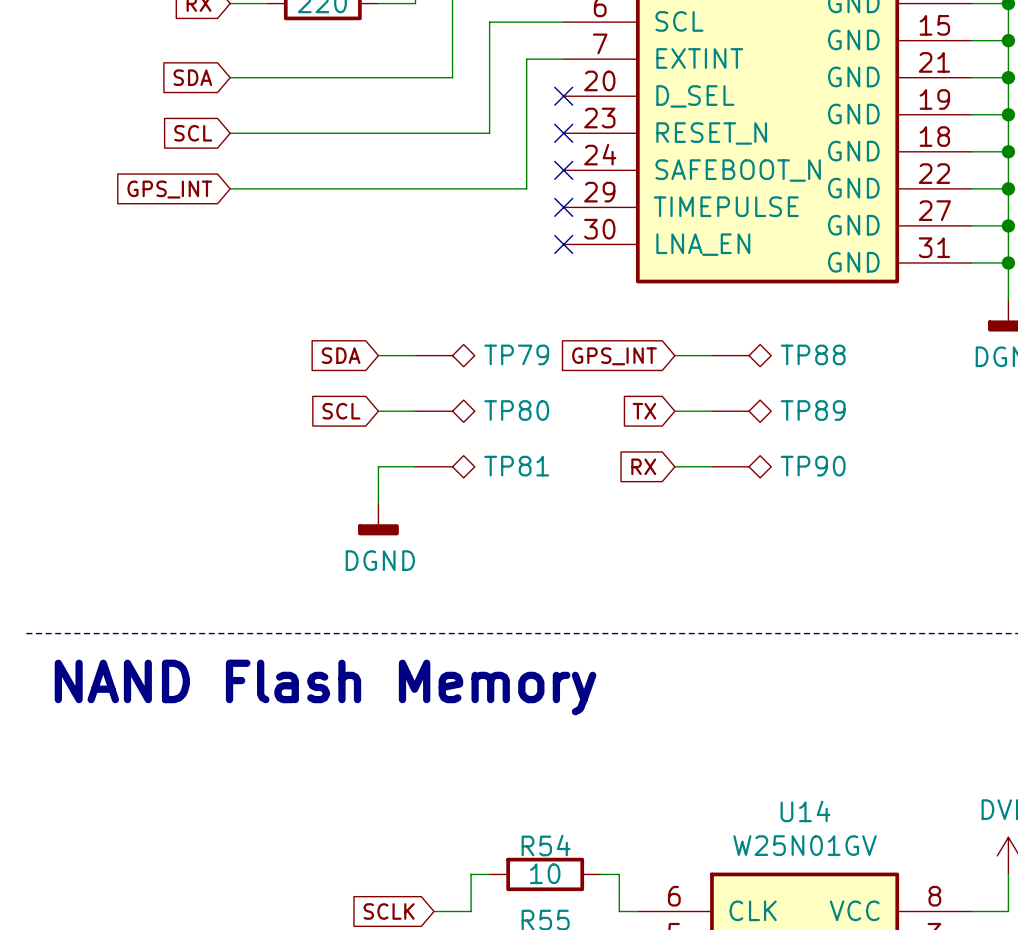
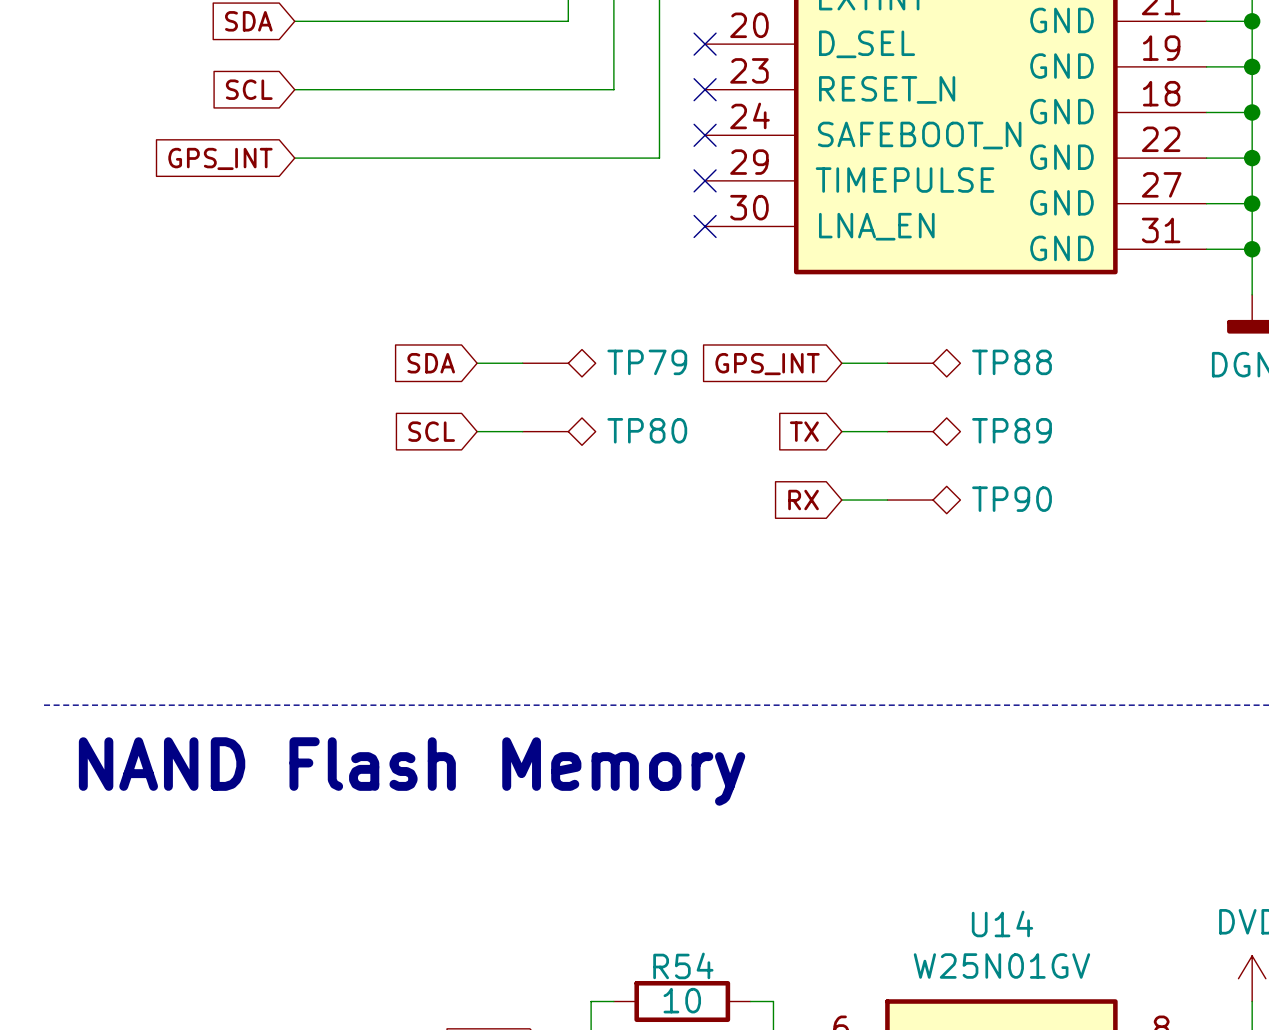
wire: (415, 466) (378, 466) (378, 503) -> none
TP81: (445, 466) -> none
power symbol: DGND (378, 519) -> none

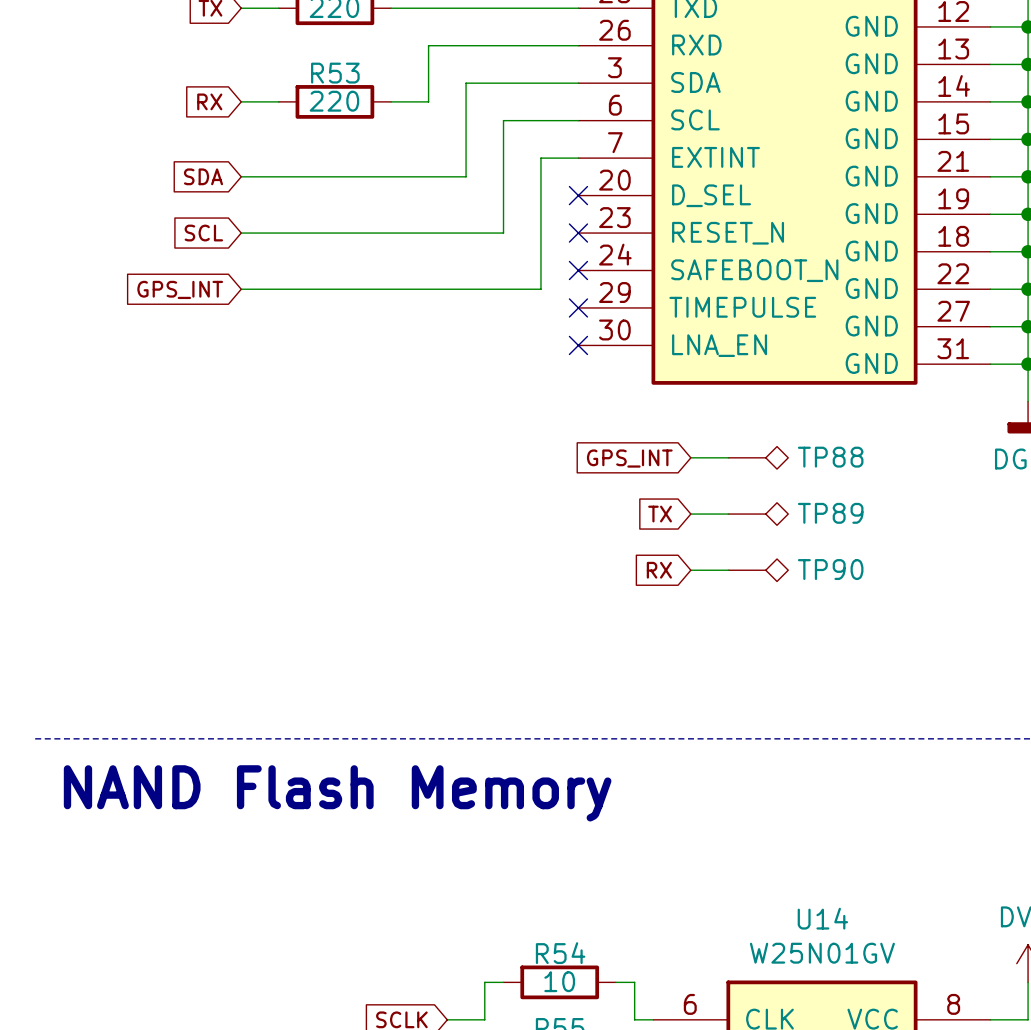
global label: SDA (431, 363) -> none
wire: (477, 363) (522, 363) -> none
TP79: (559, 363) -> none
global label: SCL (431, 431) -> none
wire: (477, 431) (522, 431) -> none
TP80: (559, 431) -> none

